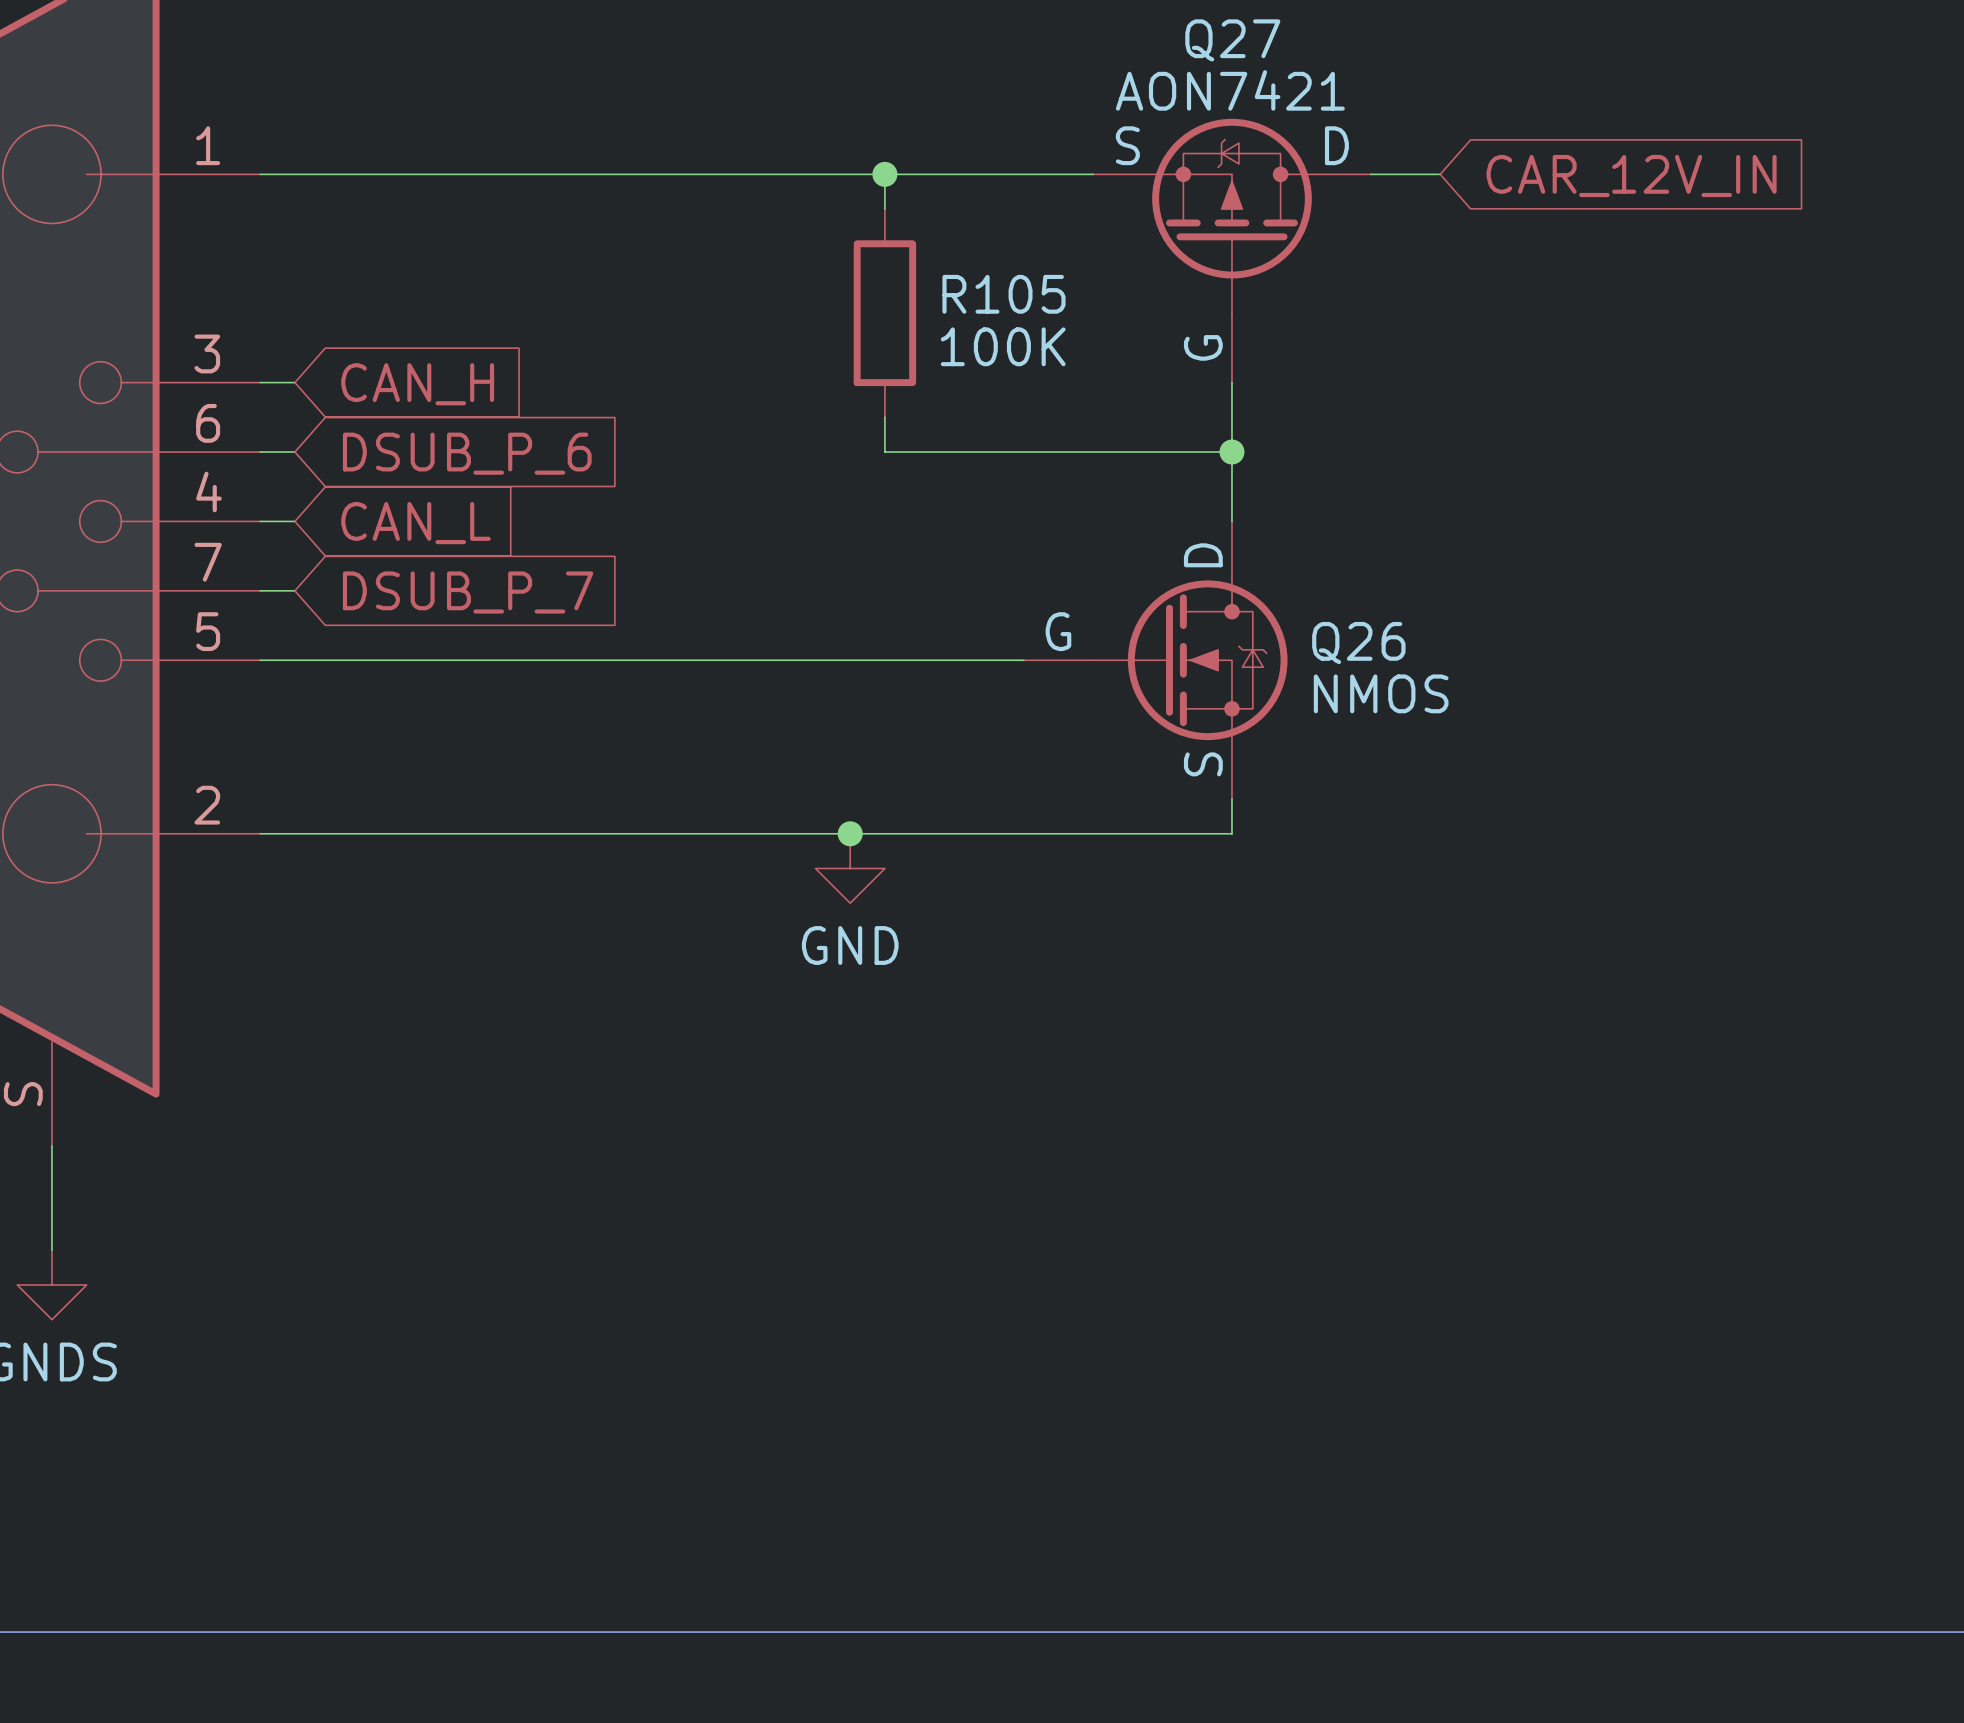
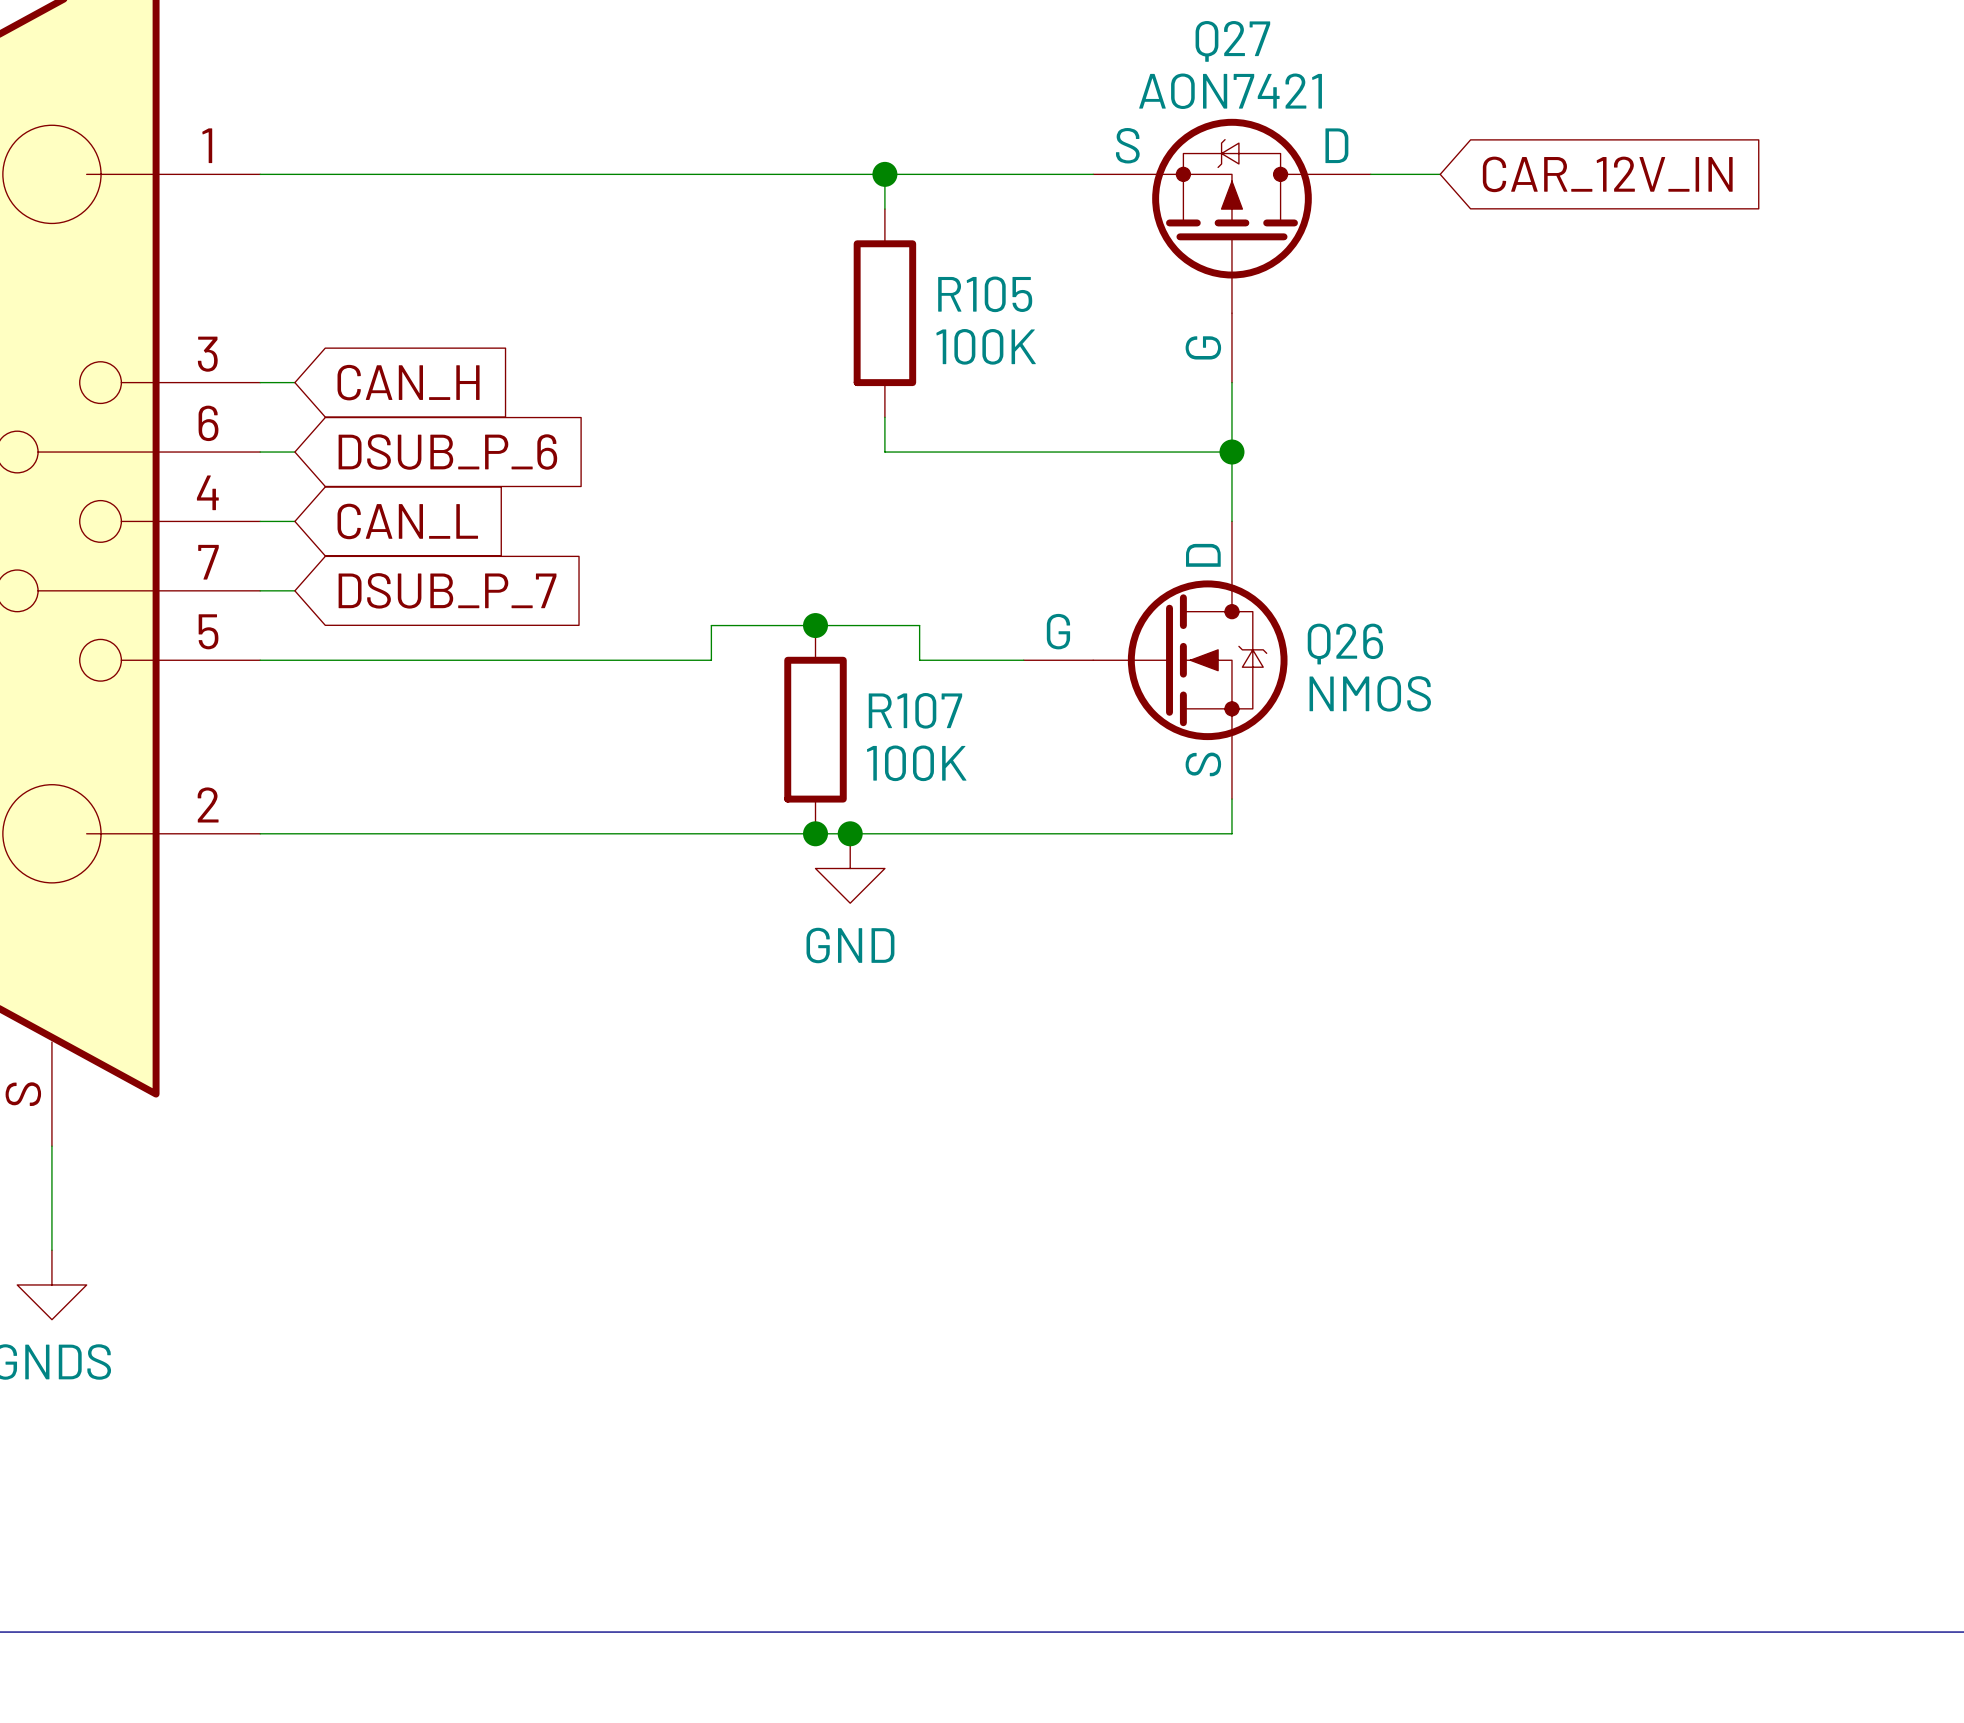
junction: none -> (815, 625)
wire: (711, 660) (919, 660) -> (711, 660) (711, 625) (919, 625) (919, 660)
R107: none -> 100K (815, 729)
junction: none -> (815, 833)

